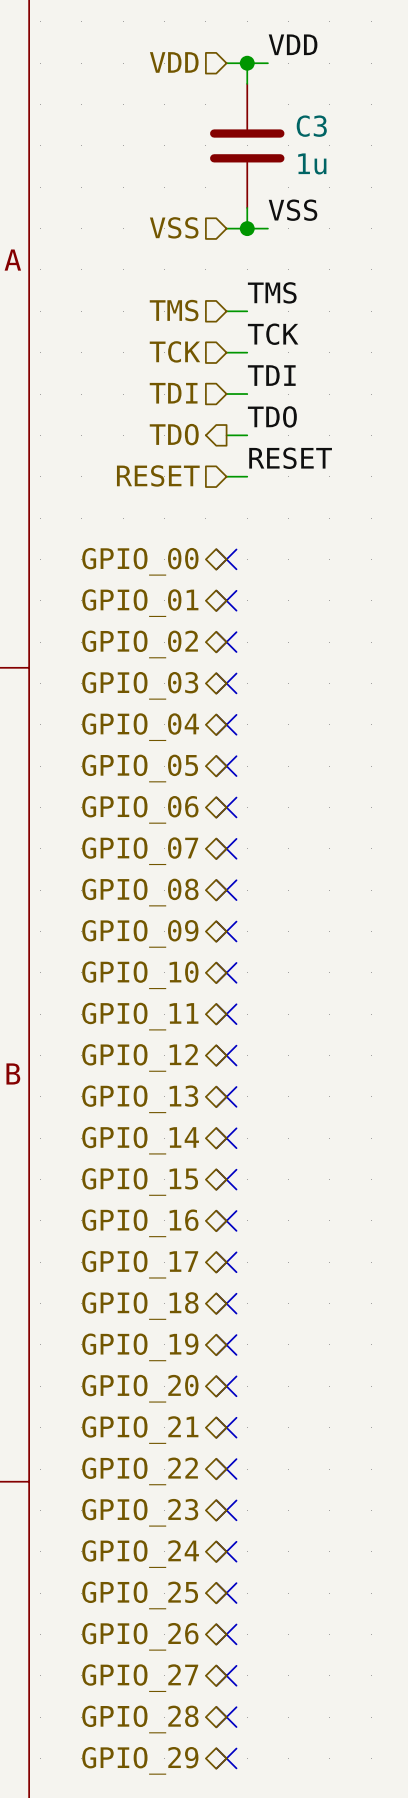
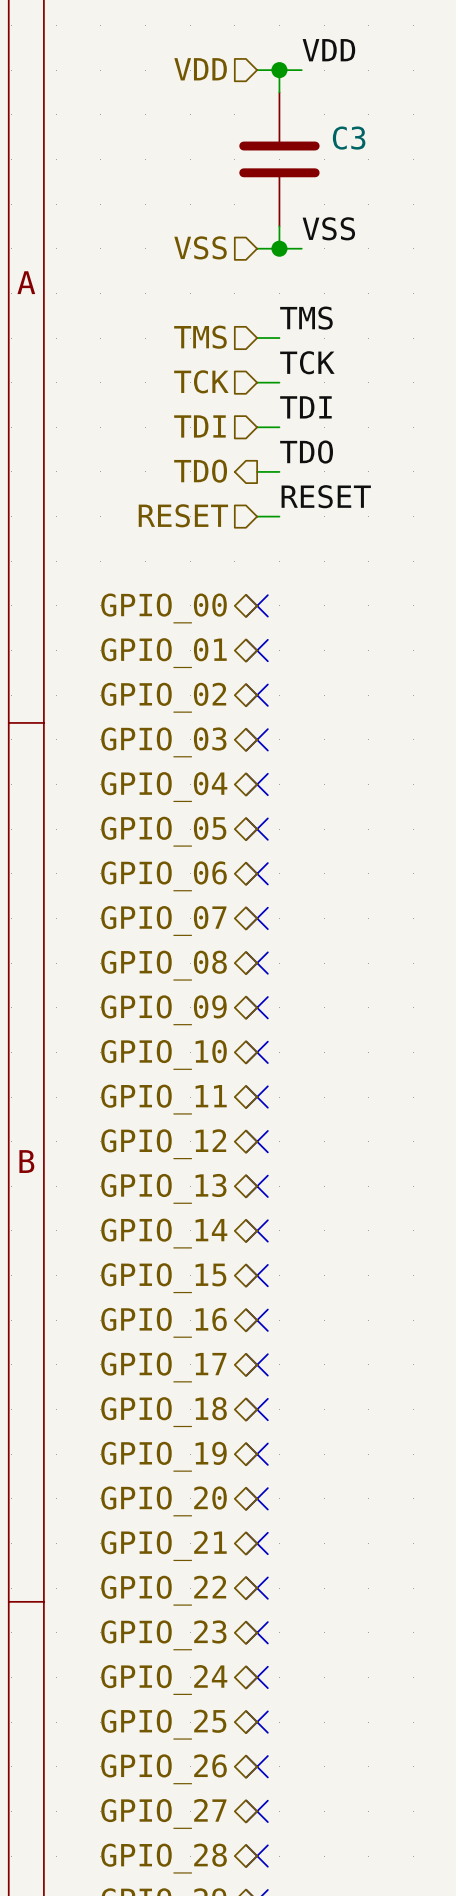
C3 value: 1u (312, 163) -> none

